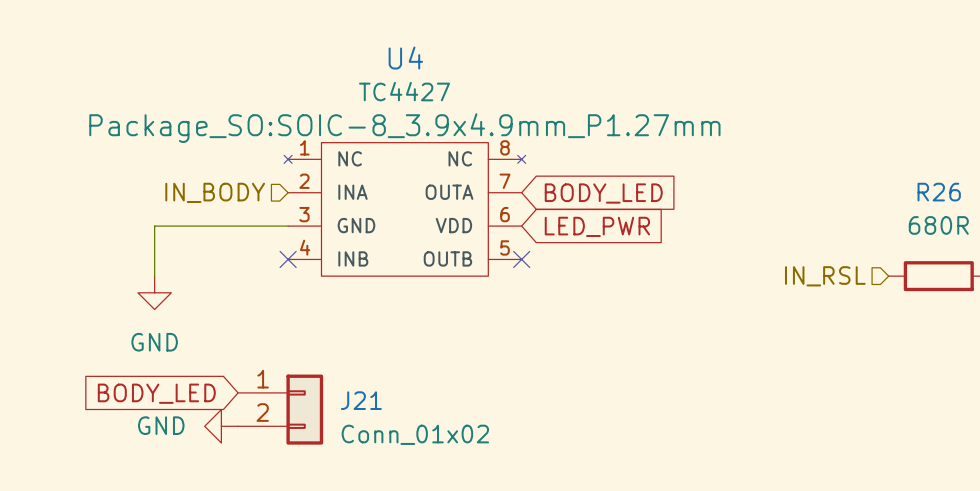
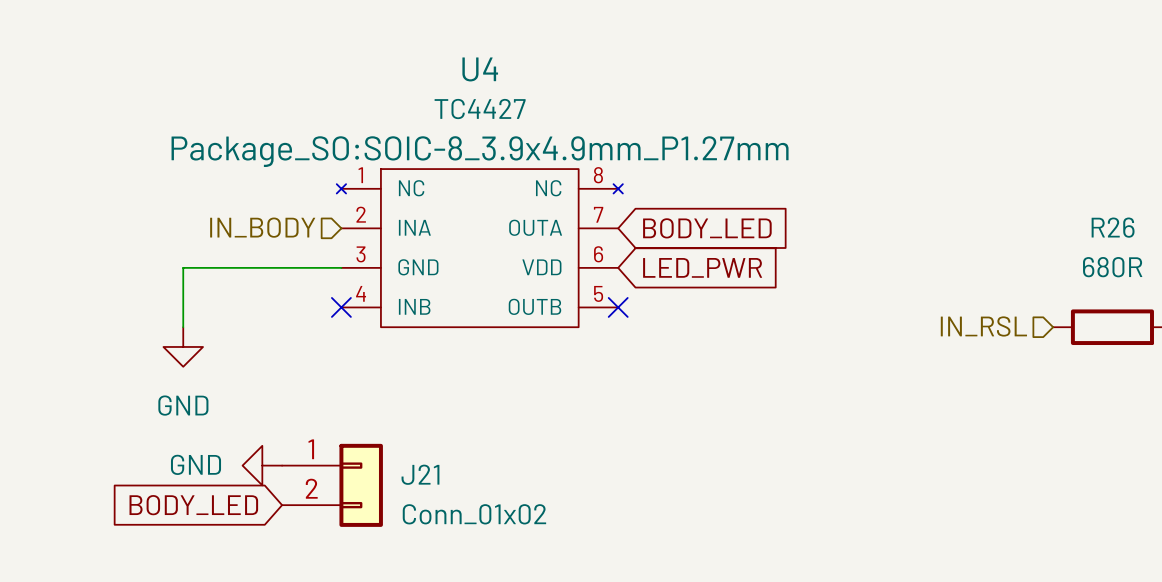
global label position: BODY_LED (156, 393) -> BODY_LED (193, 505)
power symbol position: GND (221, 426) -> GND (262, 465)

